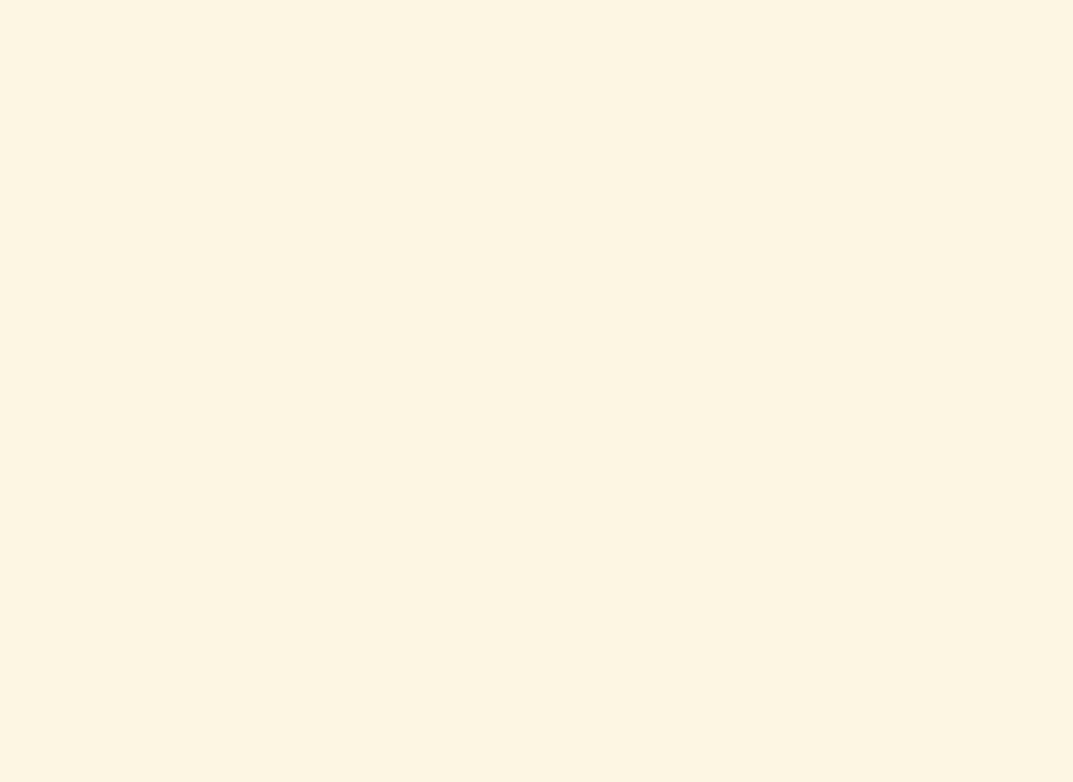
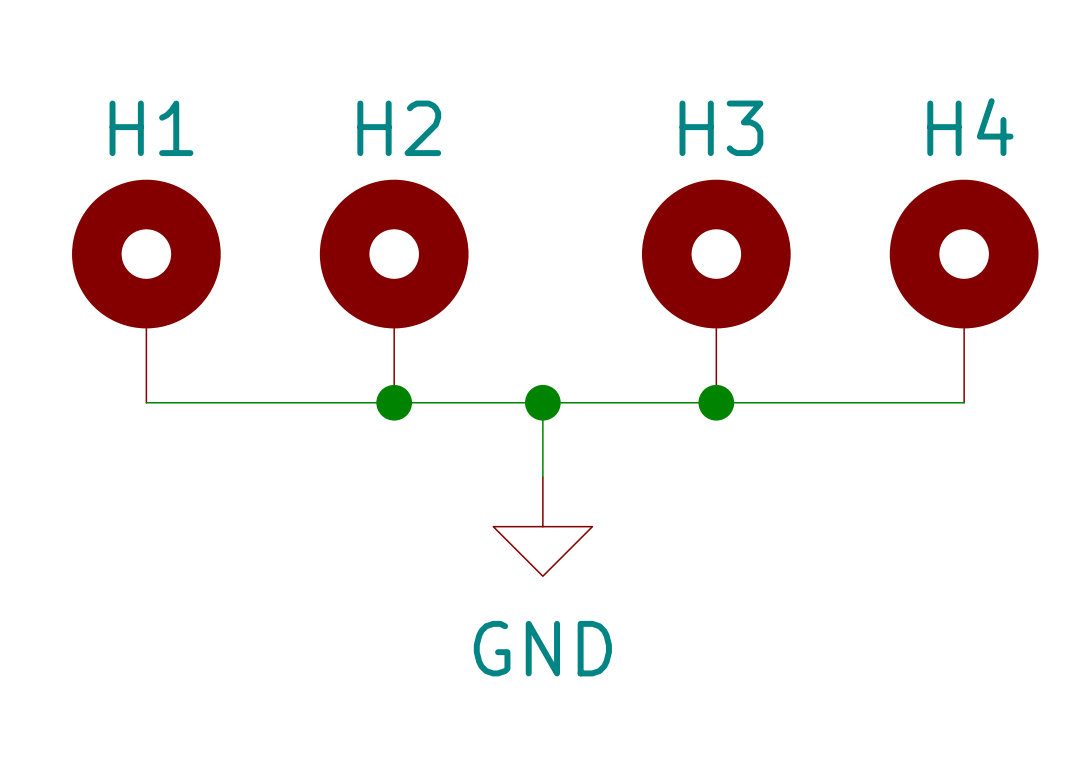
H1: none -> (146, 291)
H2: none -> (394, 291)
H3: none -> (716, 291)
H4: none -> (964, 291)
wire: none -> (146, 402) (964, 402)
junction: none -> (394, 402)
wire: none -> (542, 402) (542, 477)
junction: none -> (542, 402)
junction: none -> (716, 402)
power symbol: none -> GND (542, 526)

